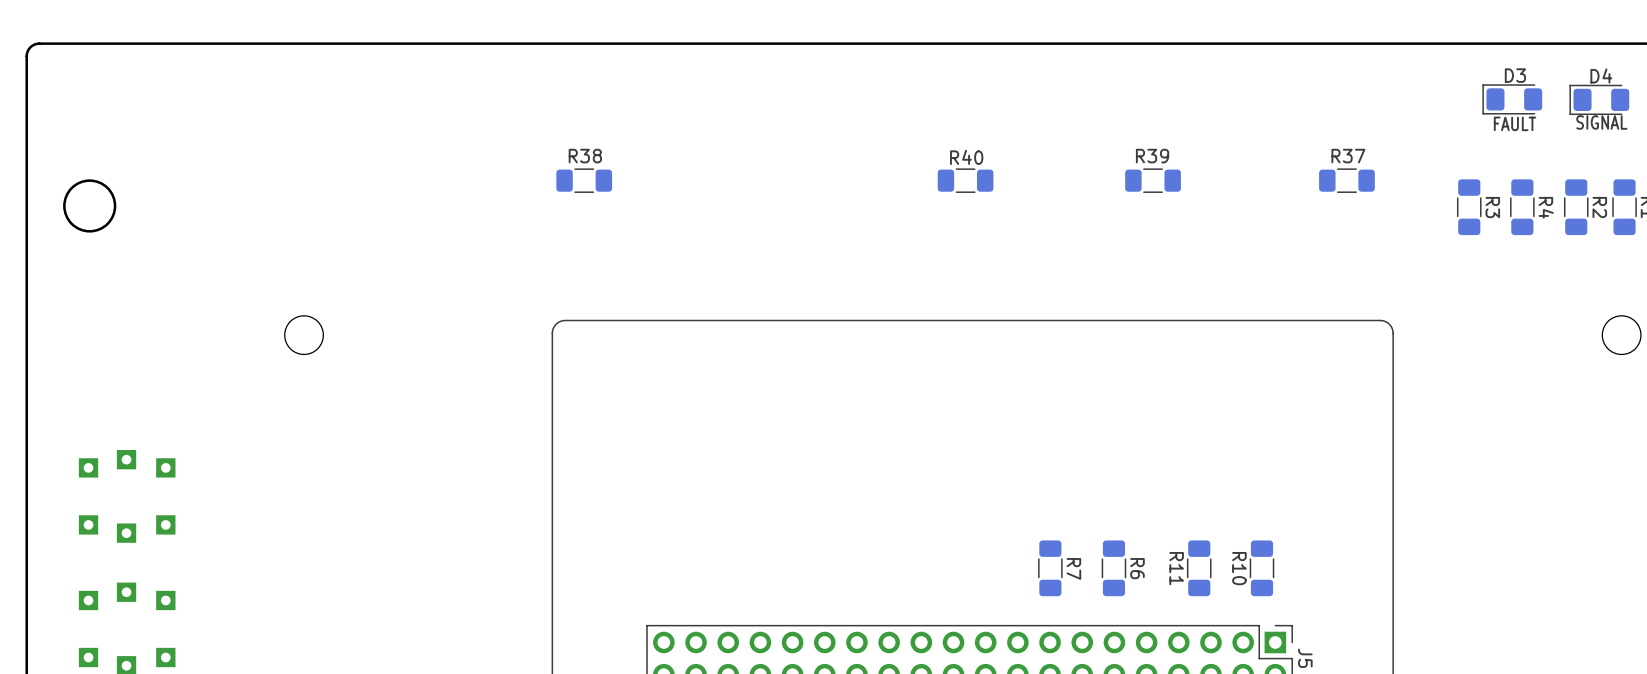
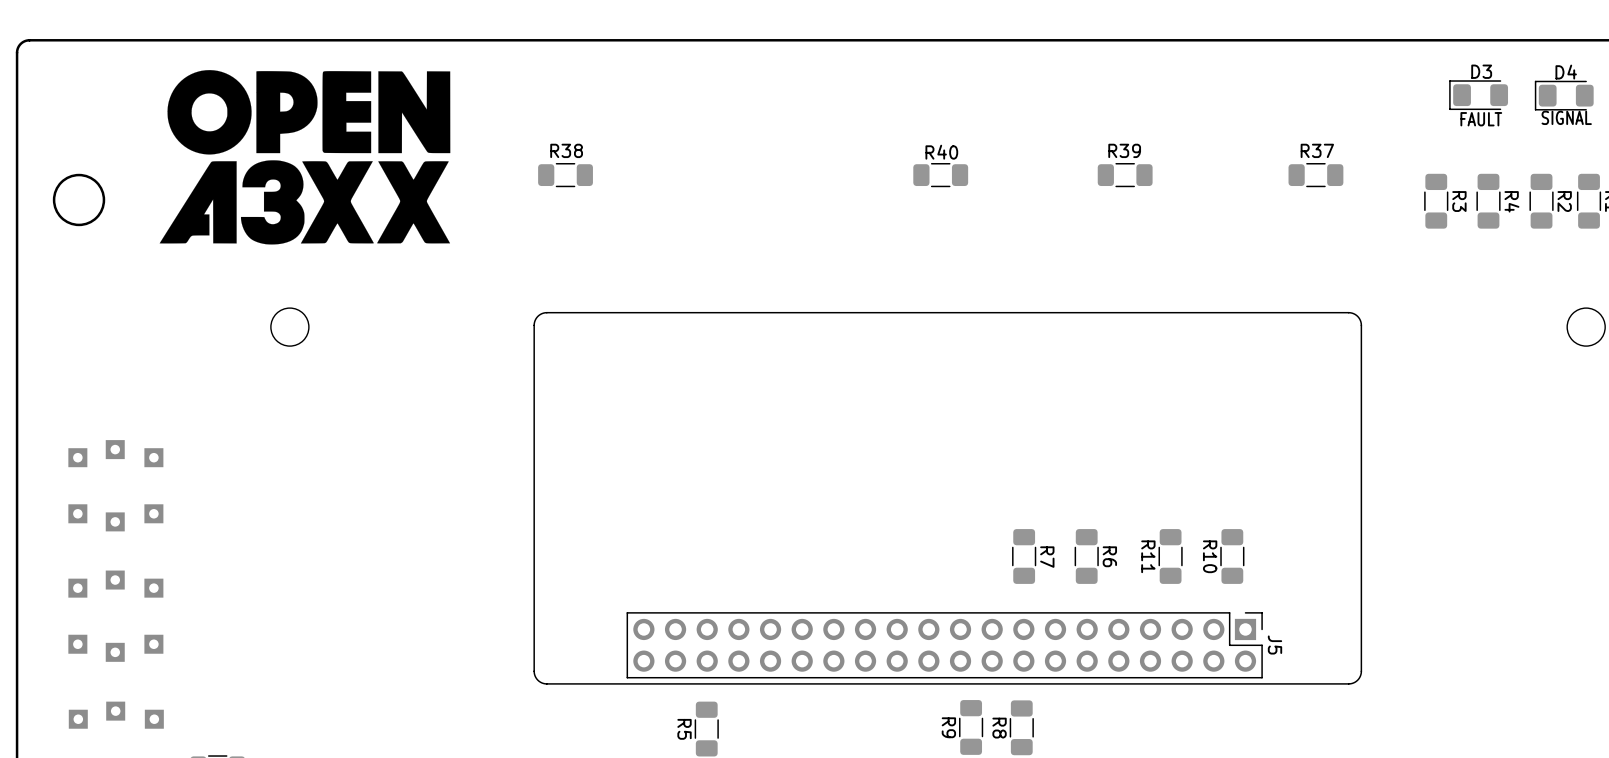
drawing: none -> [159, 70, 451, 245]

